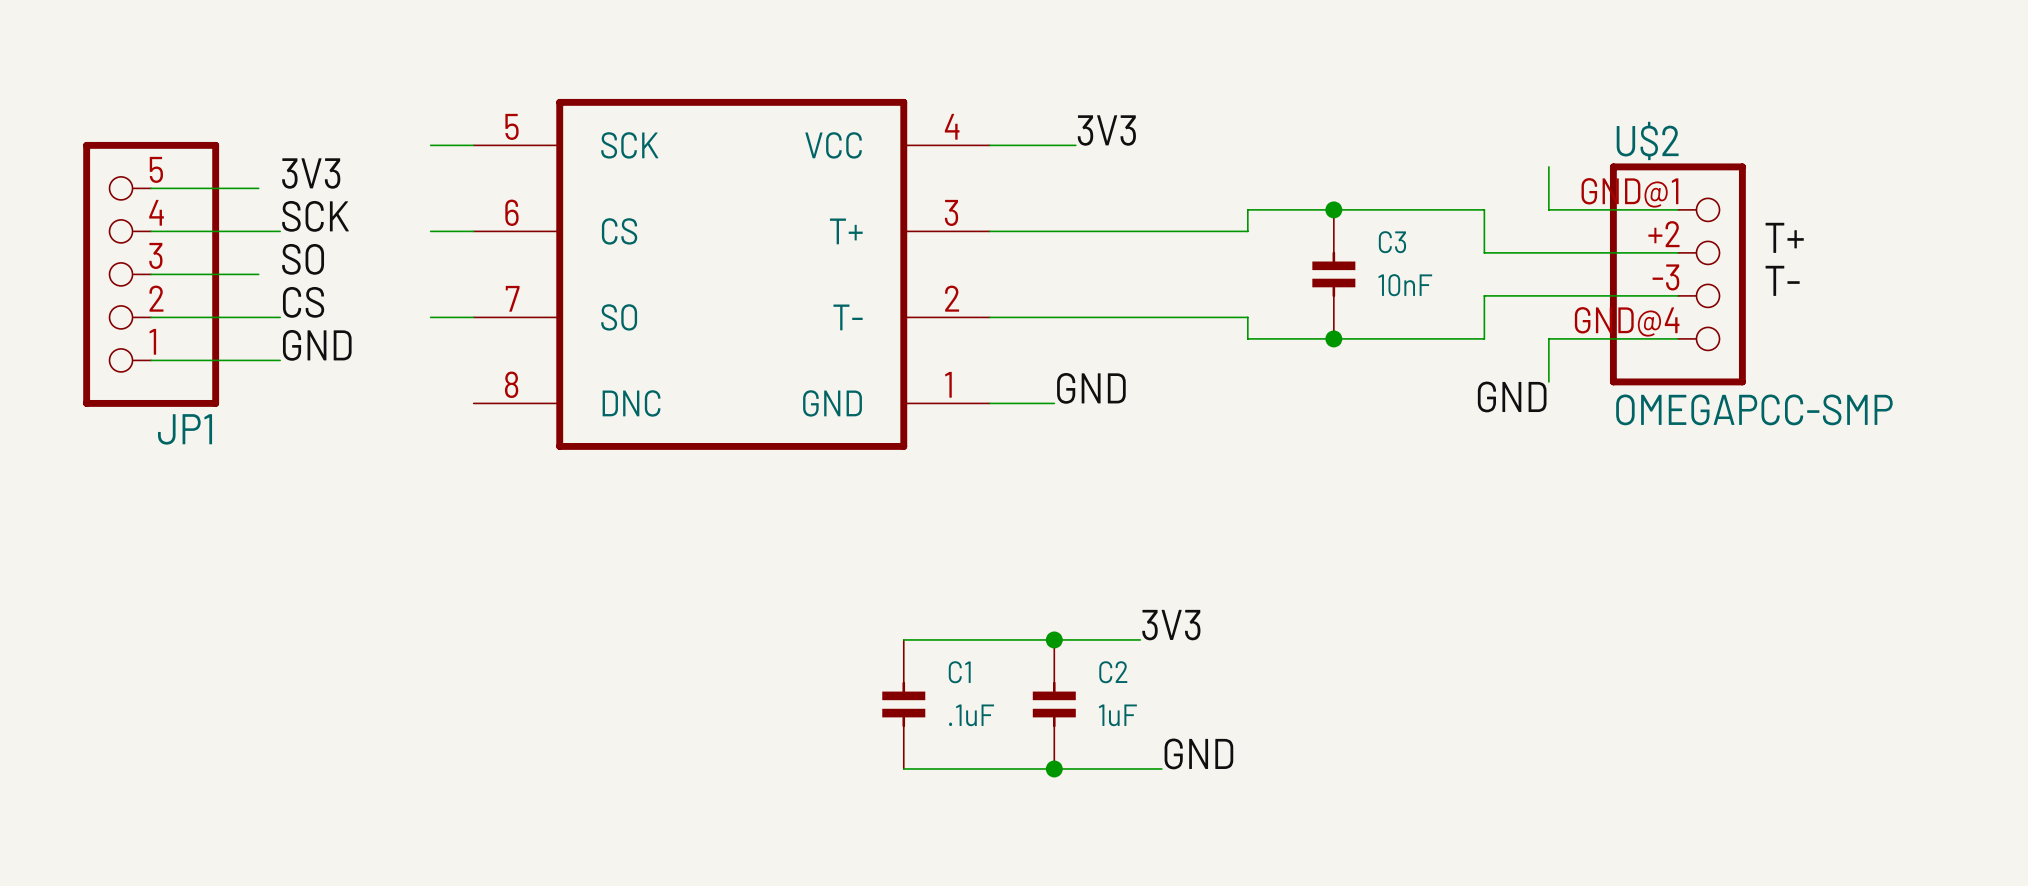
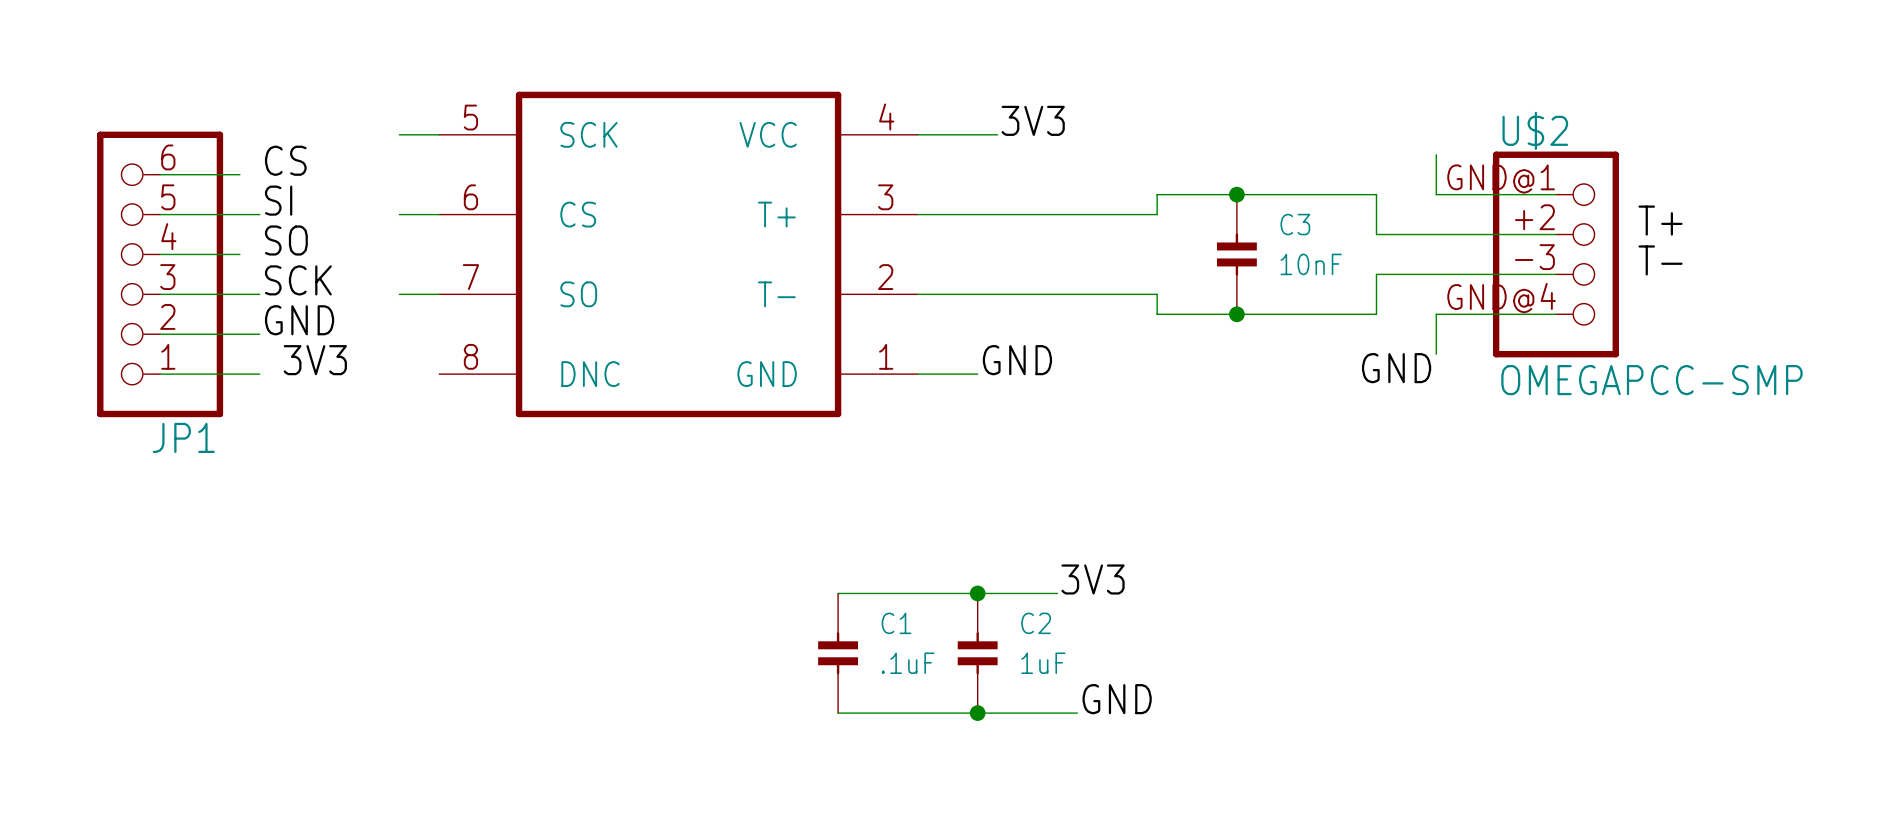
JP1 symbol: [83, 141, 220, 407] -> [97, 131, 224, 418]
label: 3V3 (311, 173) -> CS (285, 160)
label: SCK (315, 216) -> SI (278, 200)
label: CS (303, 302) -> SCK (298, 280)
label: none -> 3V3 (315, 360)
wire: none -> (160, 374) (259, 374)

